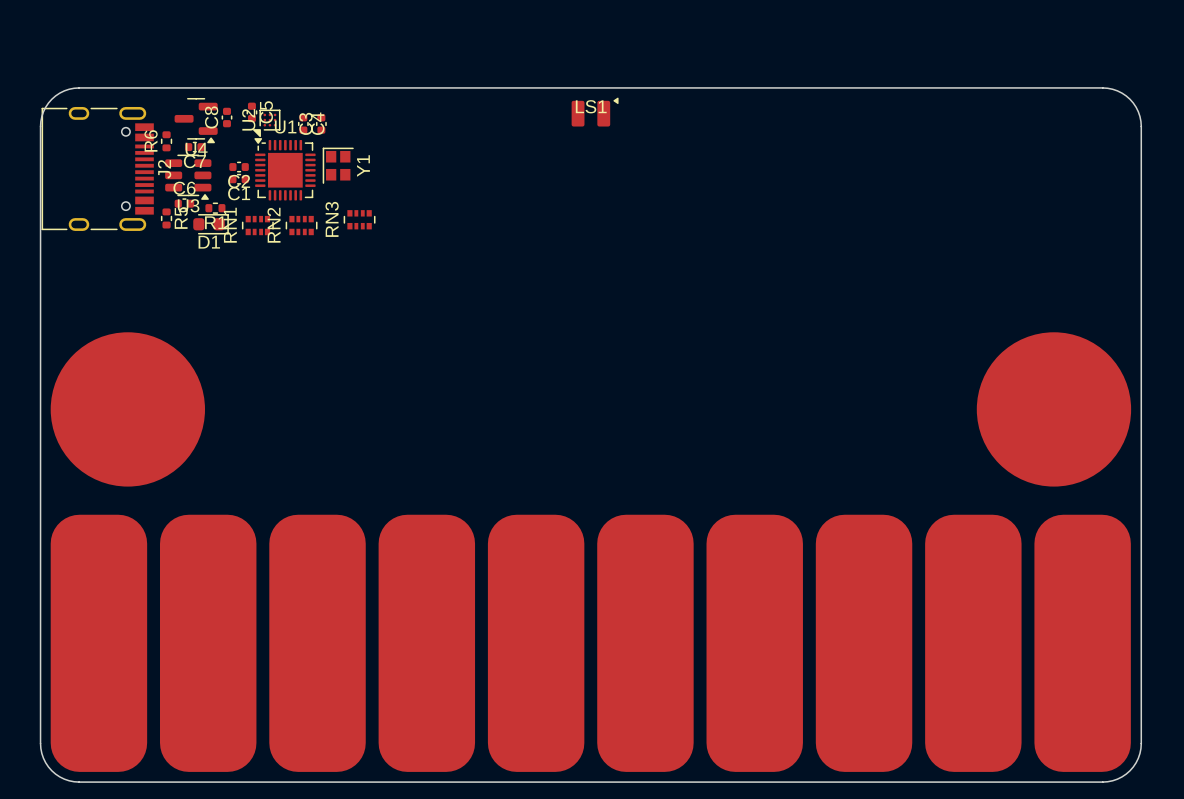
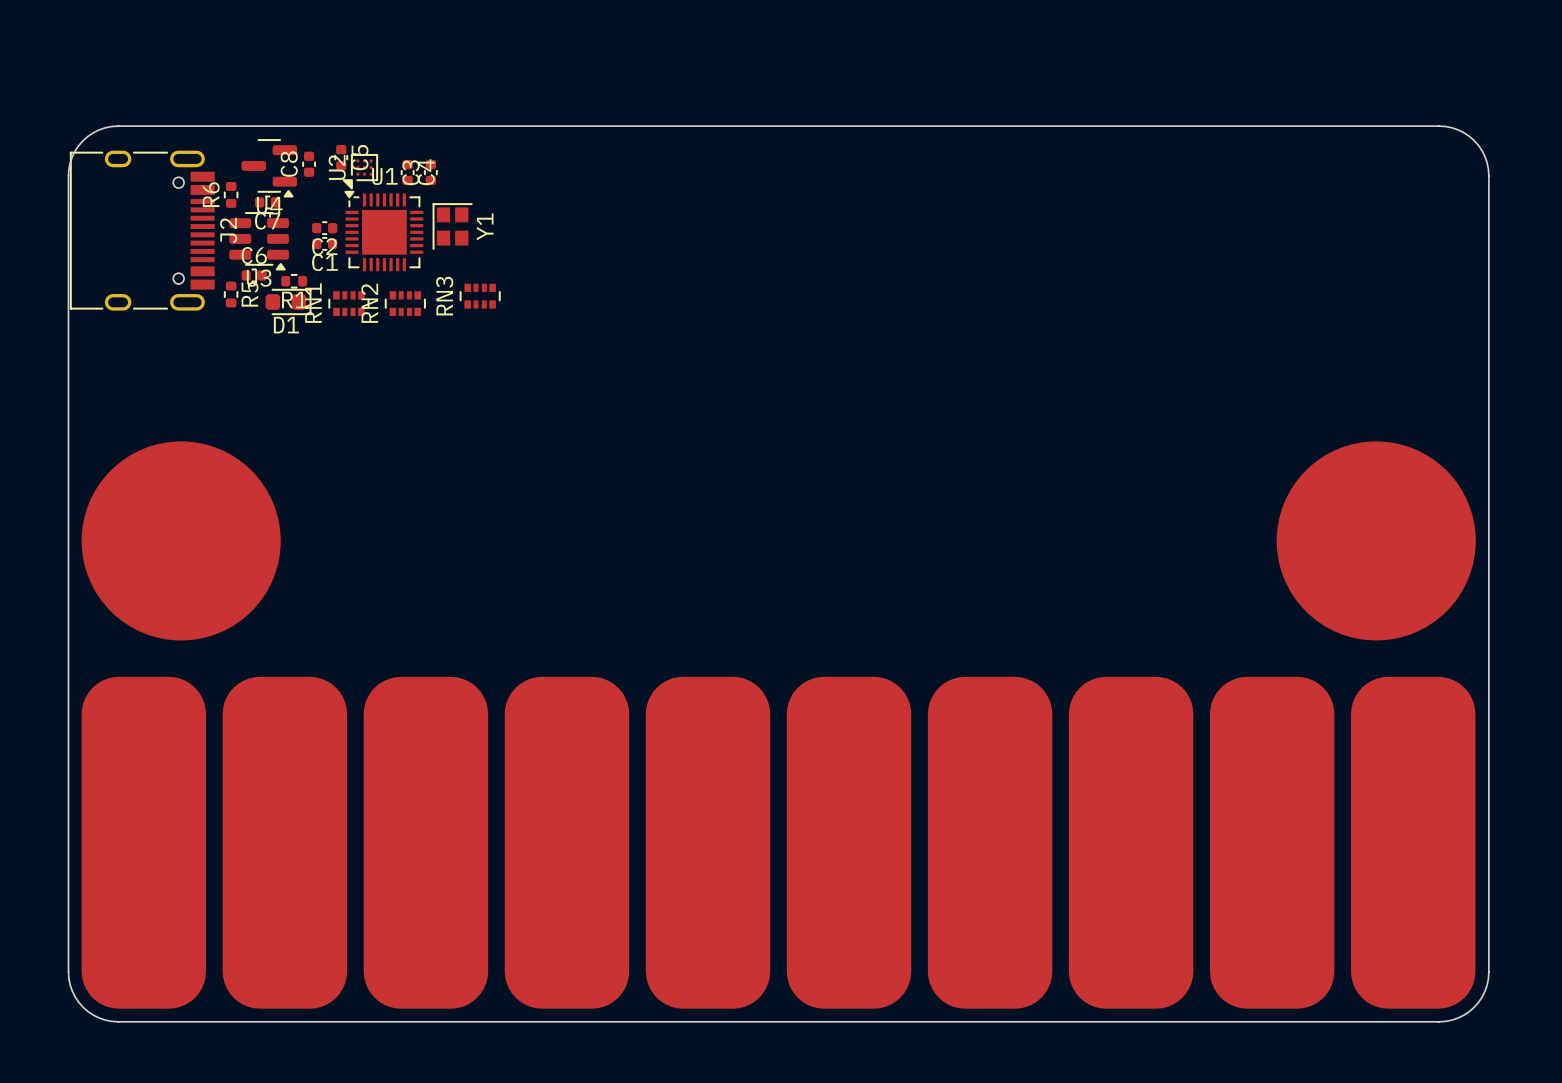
LS1: (595, 112) -> none

